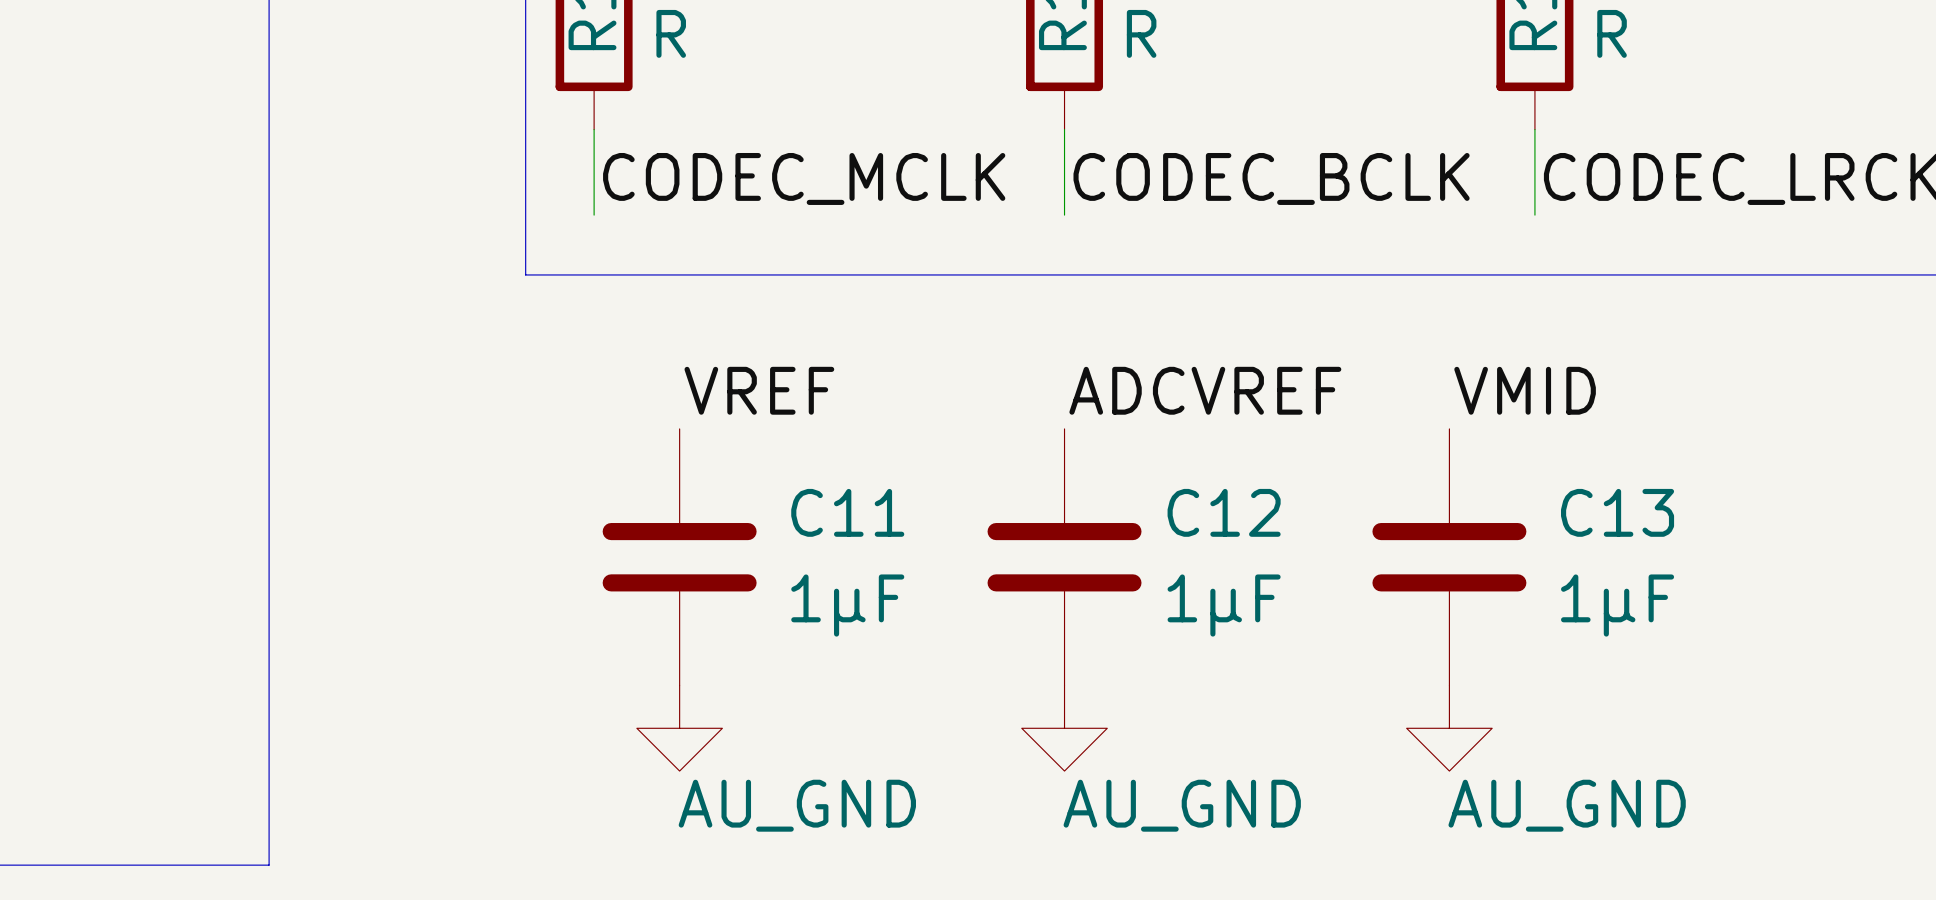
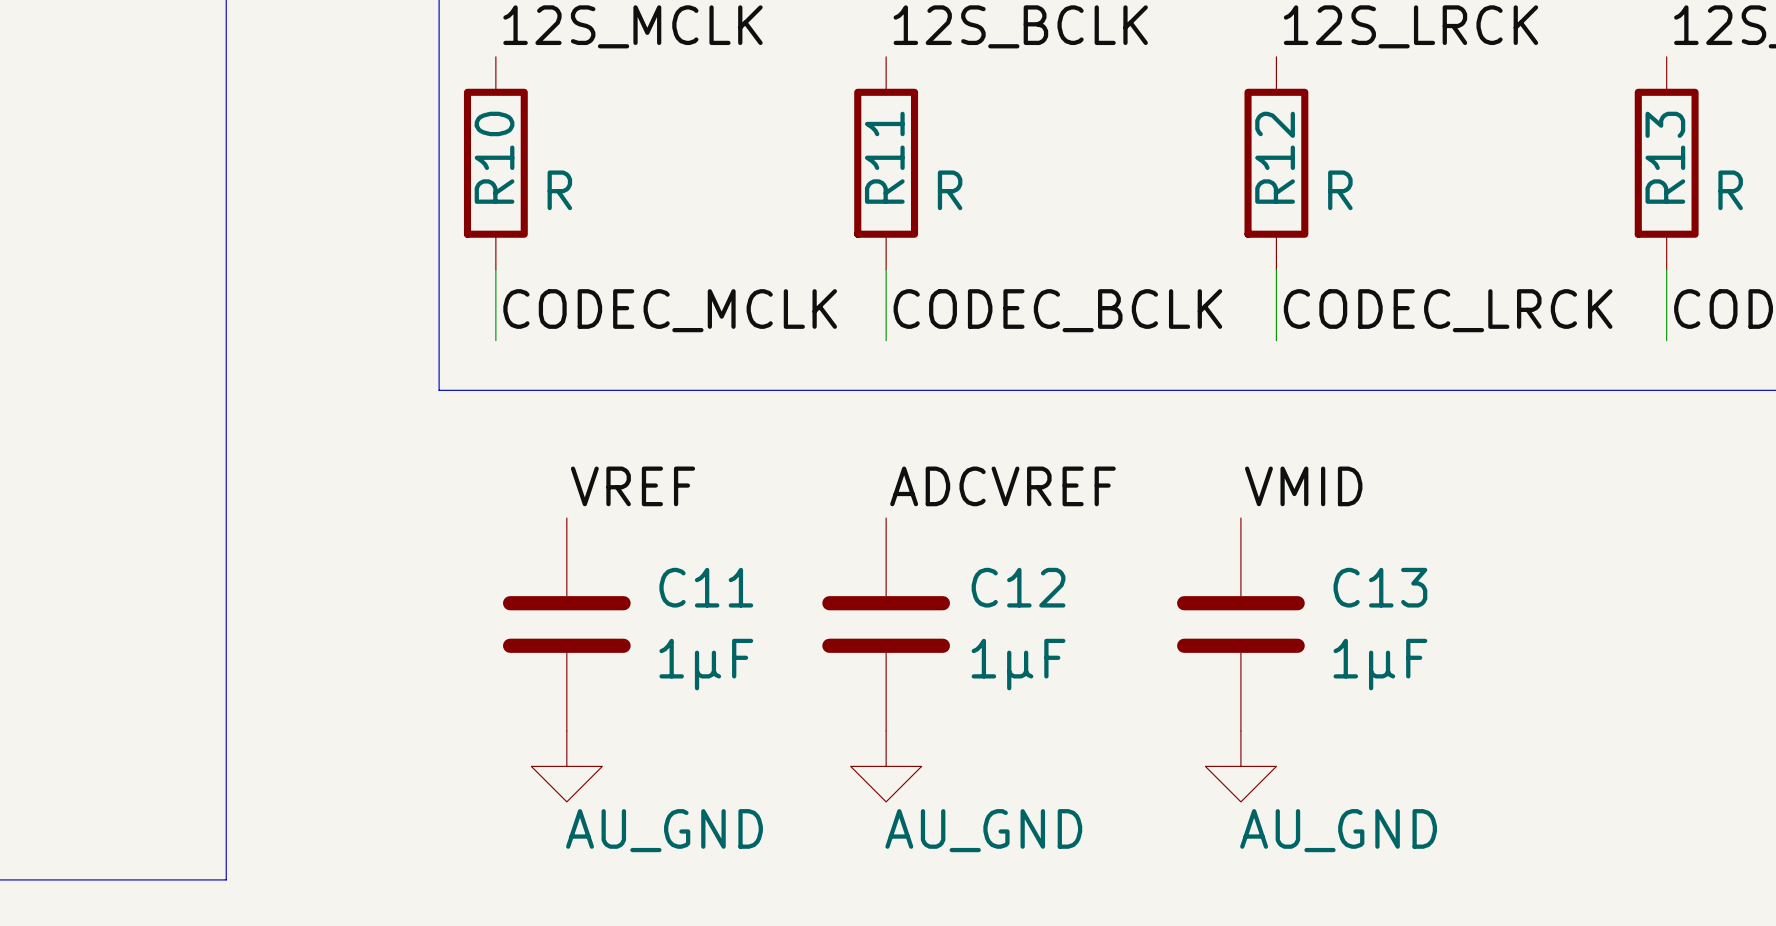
label position: VMID (1525, 390) -> VMID (1303, 486)
C13 position: (1449, 557) -> (1240, 624)
power symbol position: AU_GND (1449, 728) -> AU_GND (1240, 766)

